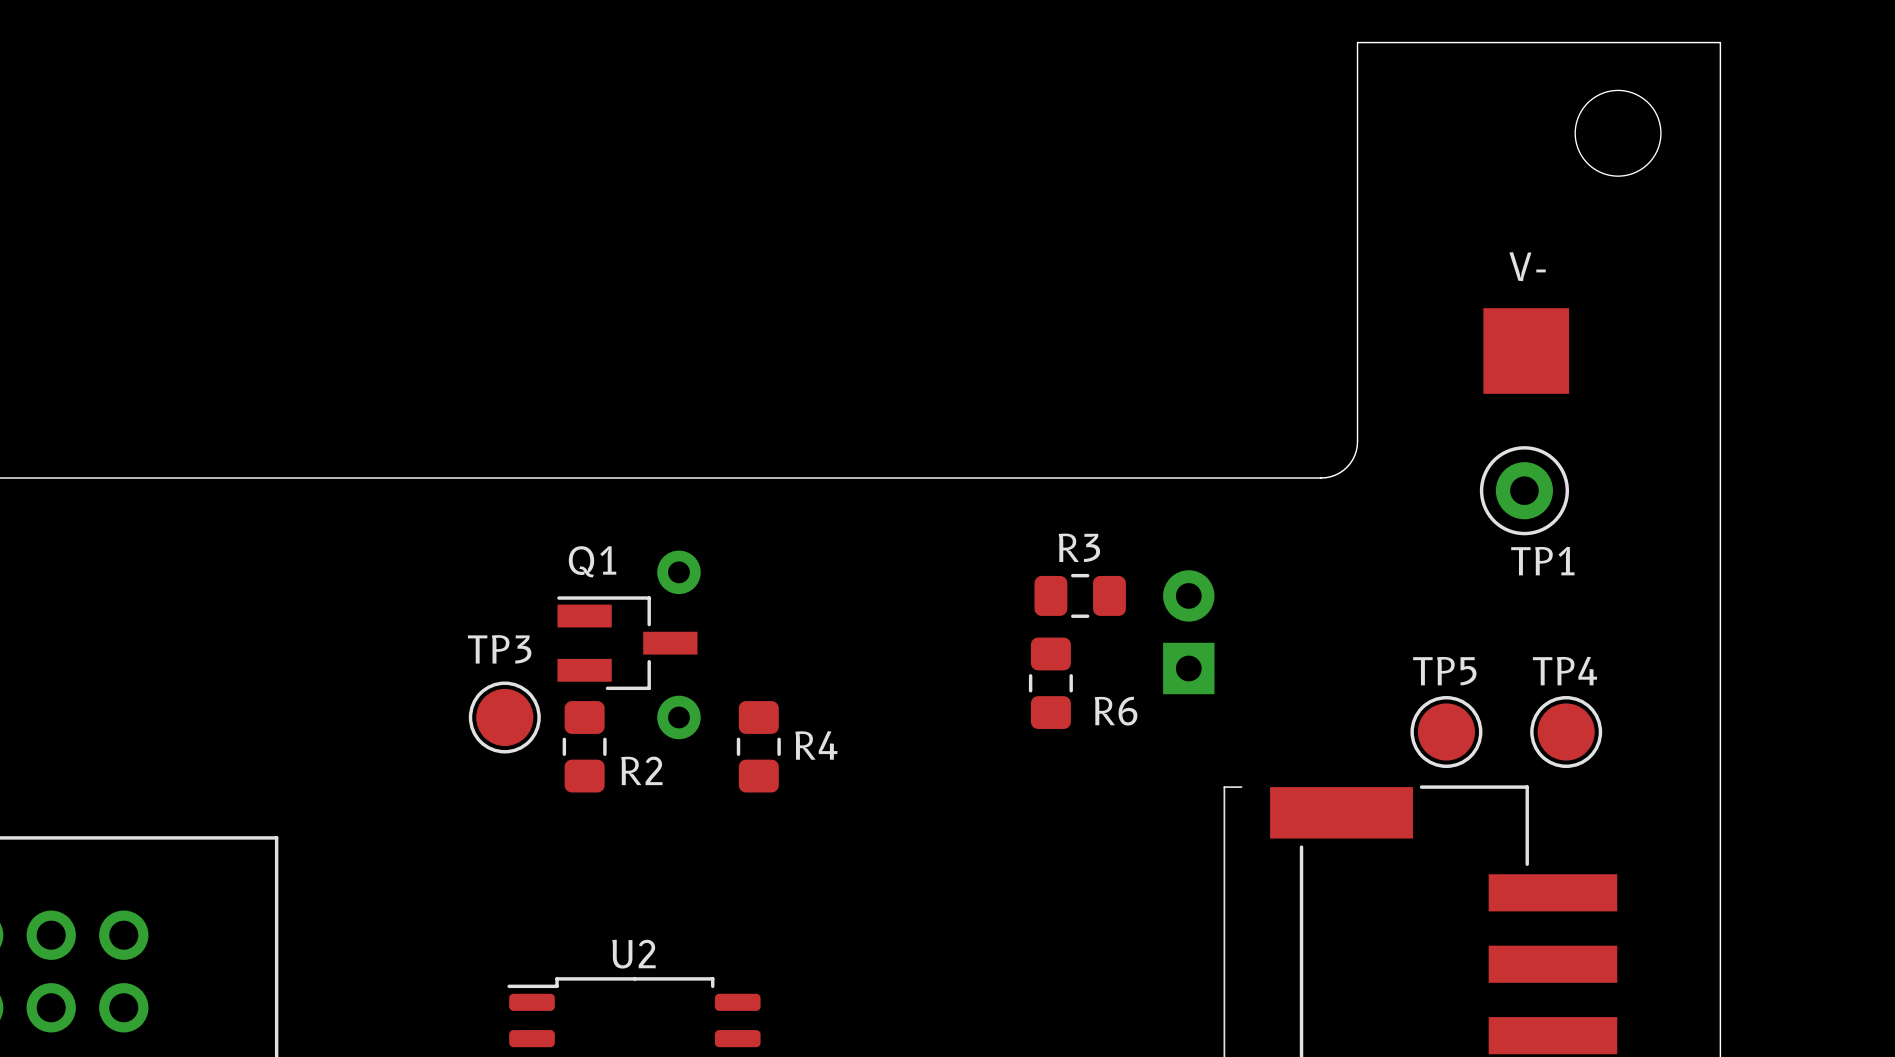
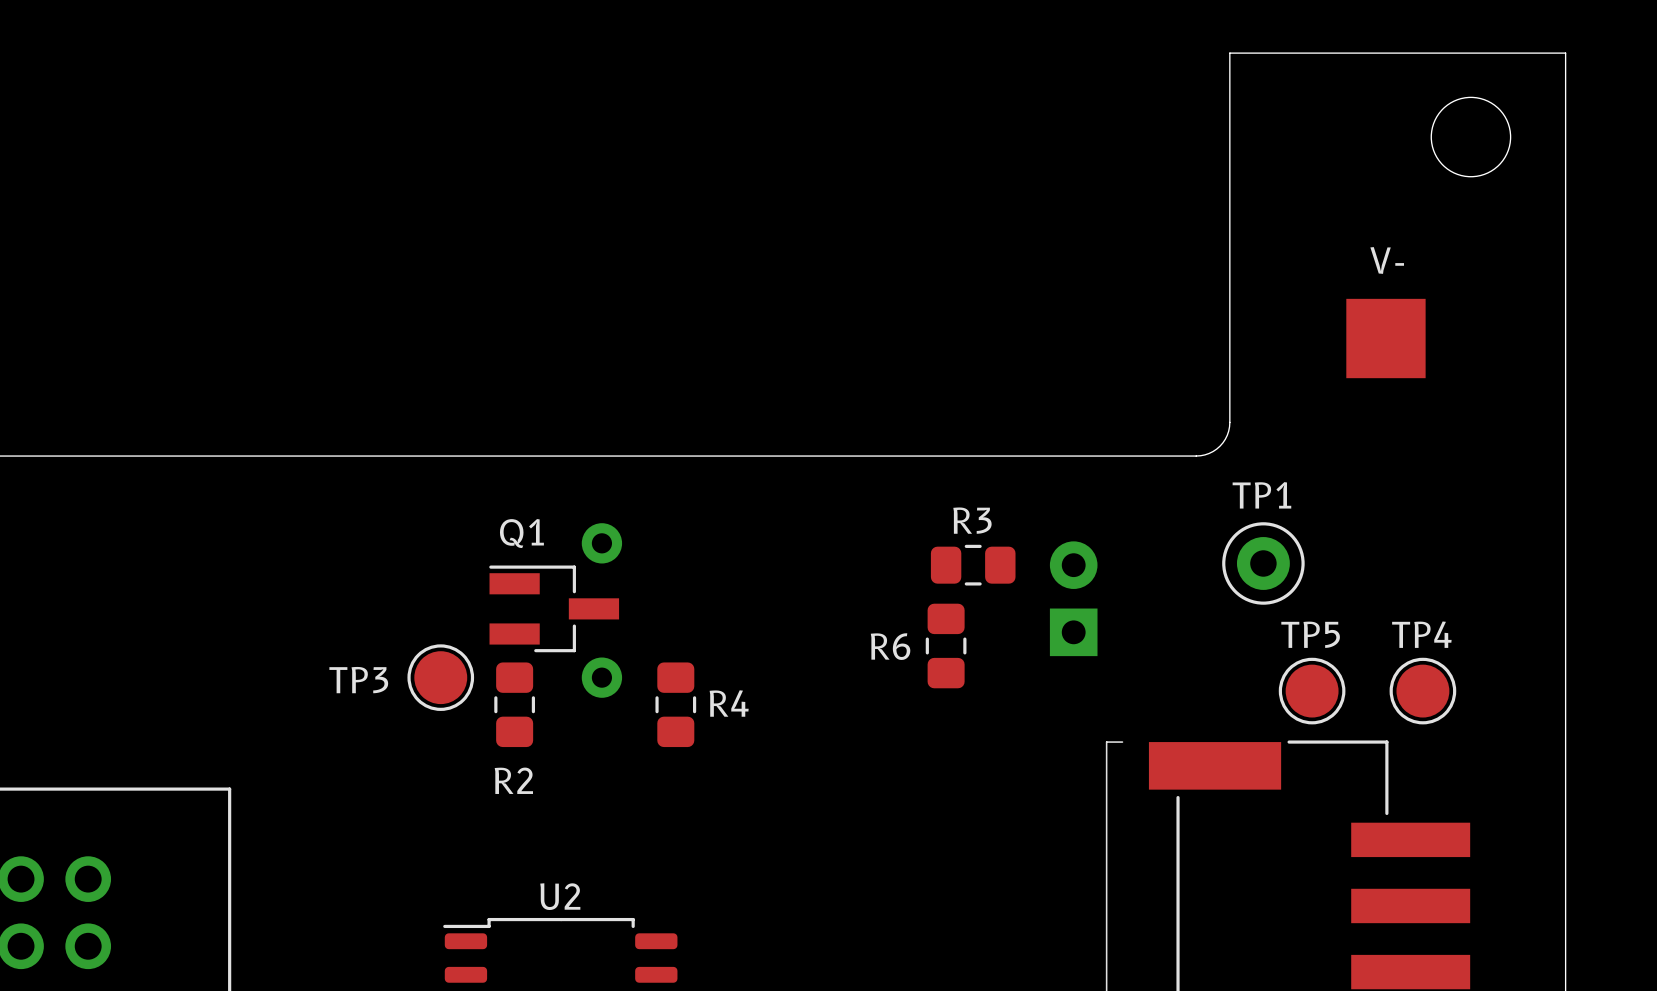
TP1 position: (1524, 490) -> (1263, 563)
TP1 name position: TP1 (1542, 561) -> TP1 (1261, 495)
TP3 name position: TP3 (499, 649) -> TP3 (358, 680)
R6 name position: R6 (1116, 711) -> R6 (890, 646)
R2 name position: R2 (641, 770) -> R2 (513, 780)

